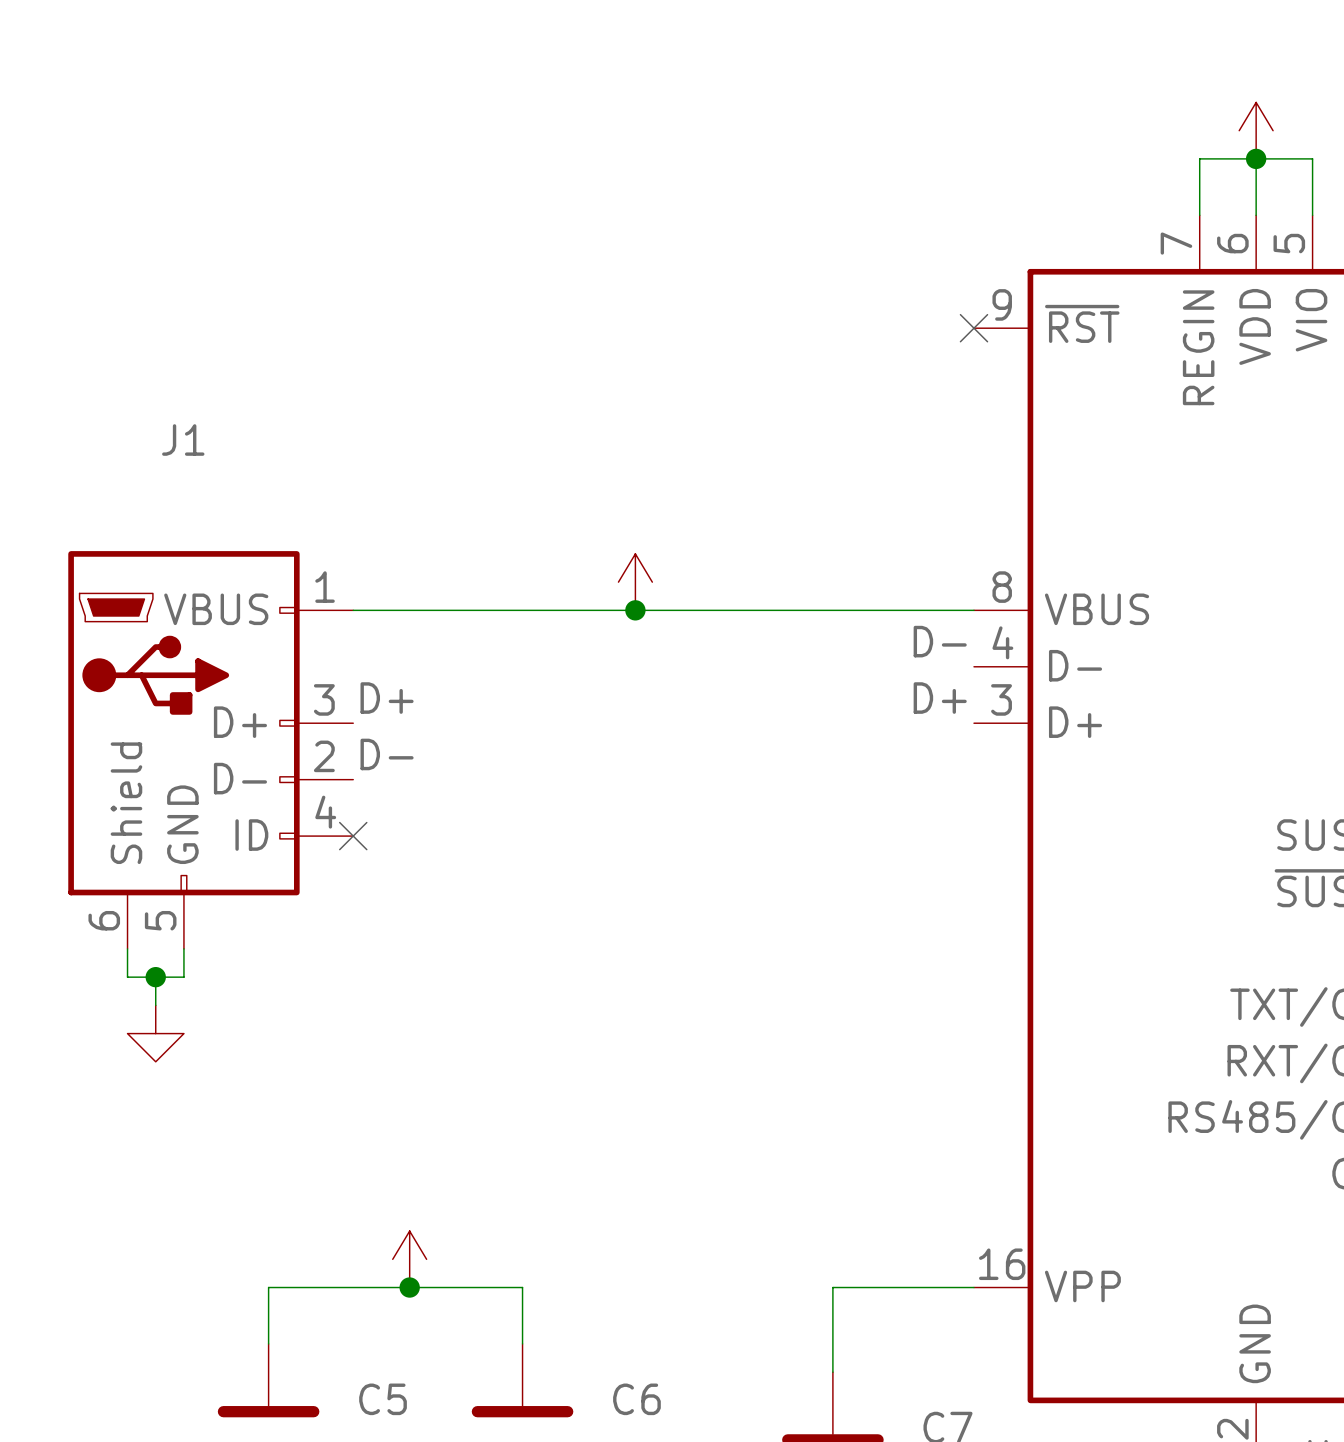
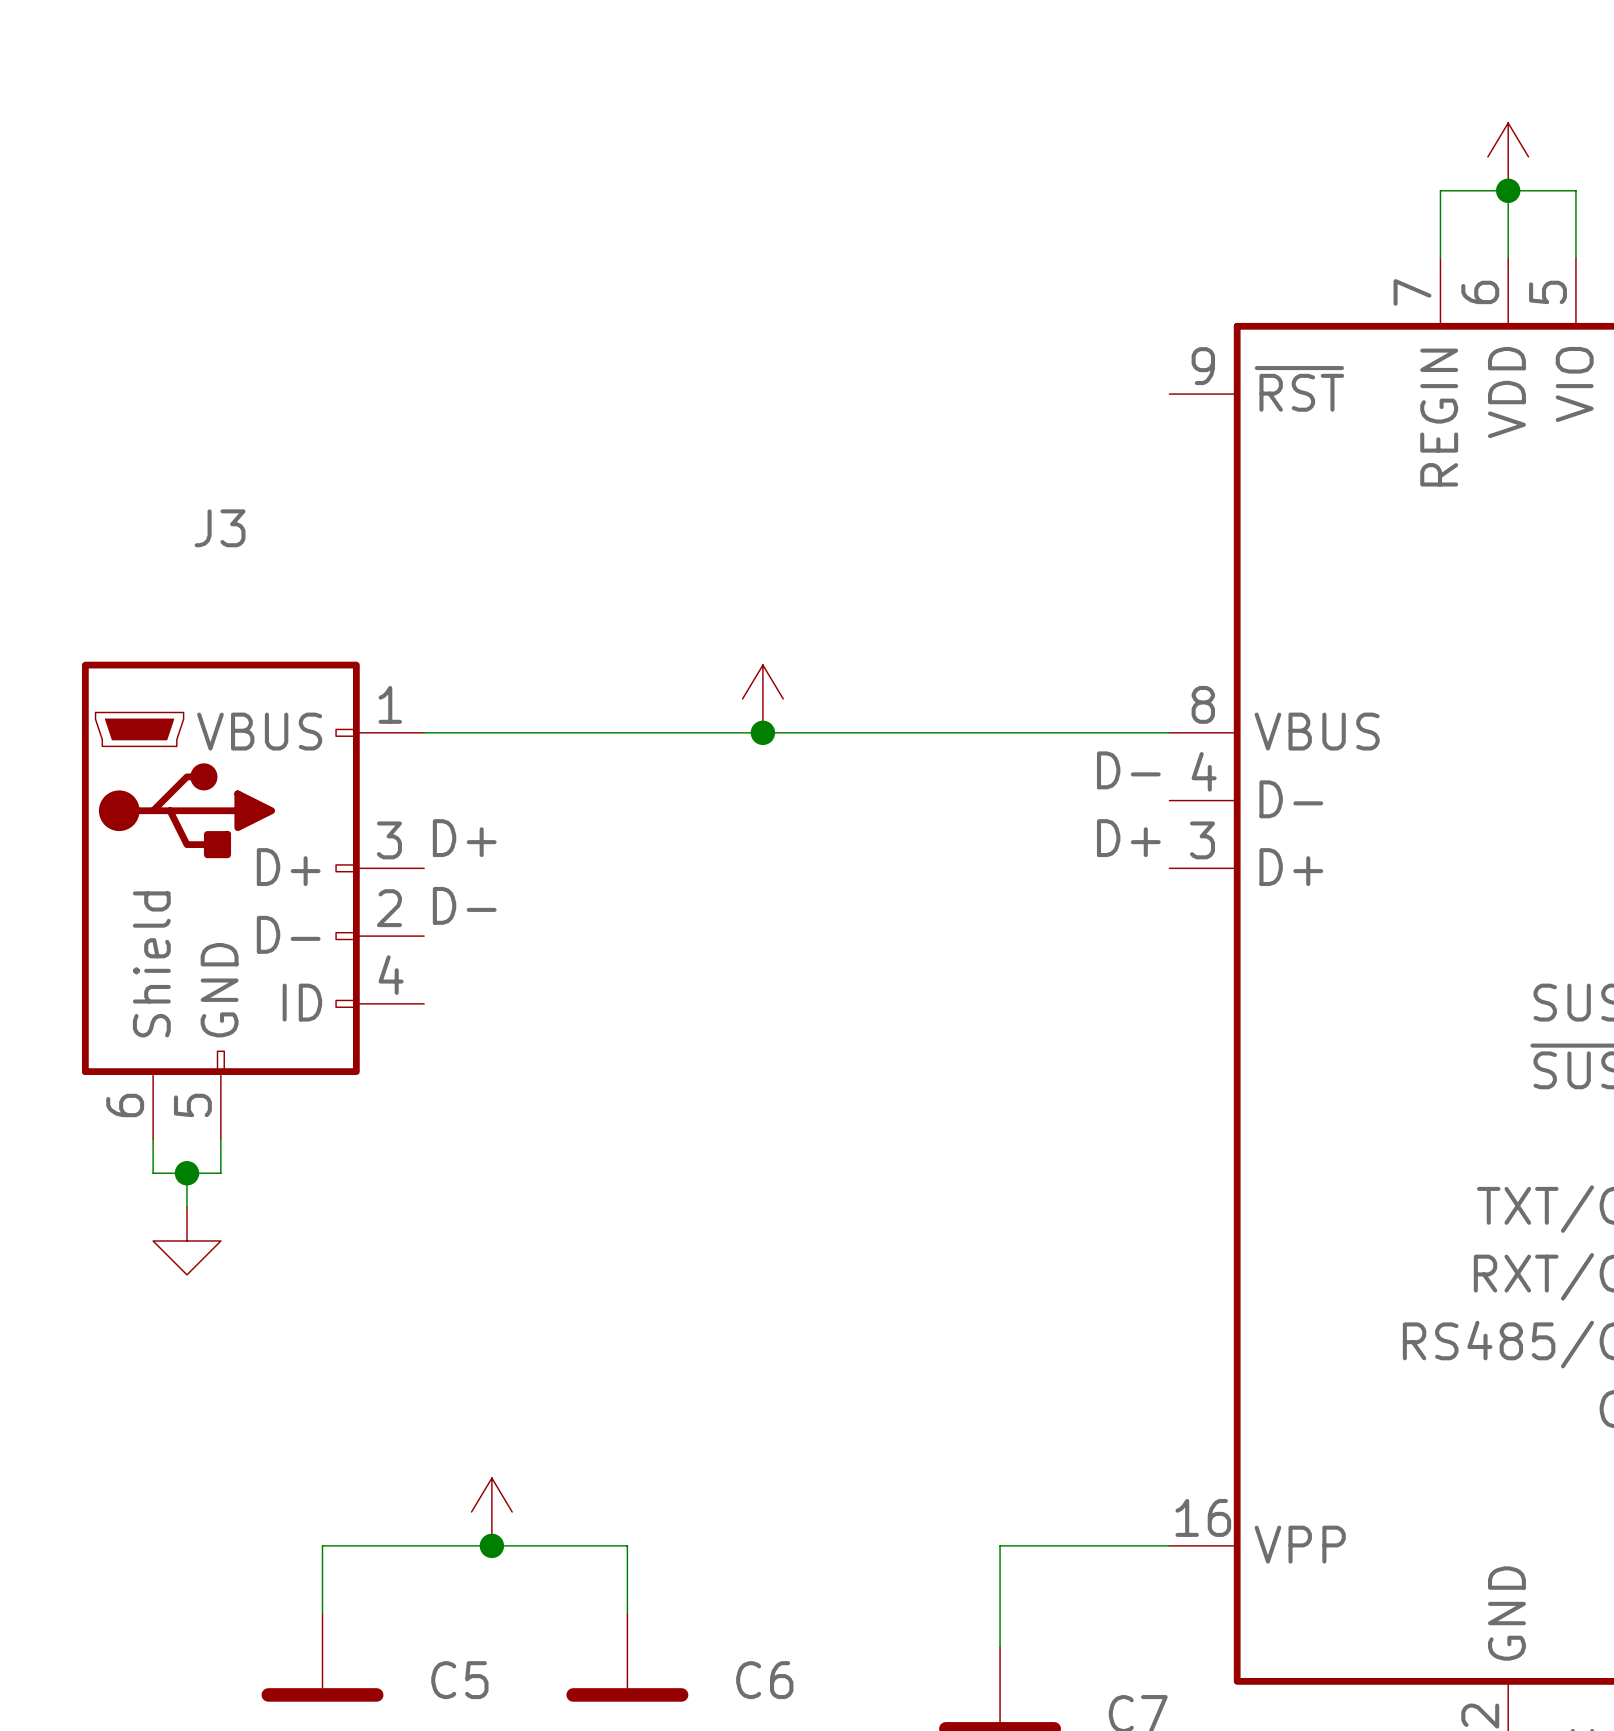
no-connect mark: (973, 328) -> none
J1 name: J1 (183, 440) -> J3 (220, 528)
no-connect mark: (353, 836) -> none

